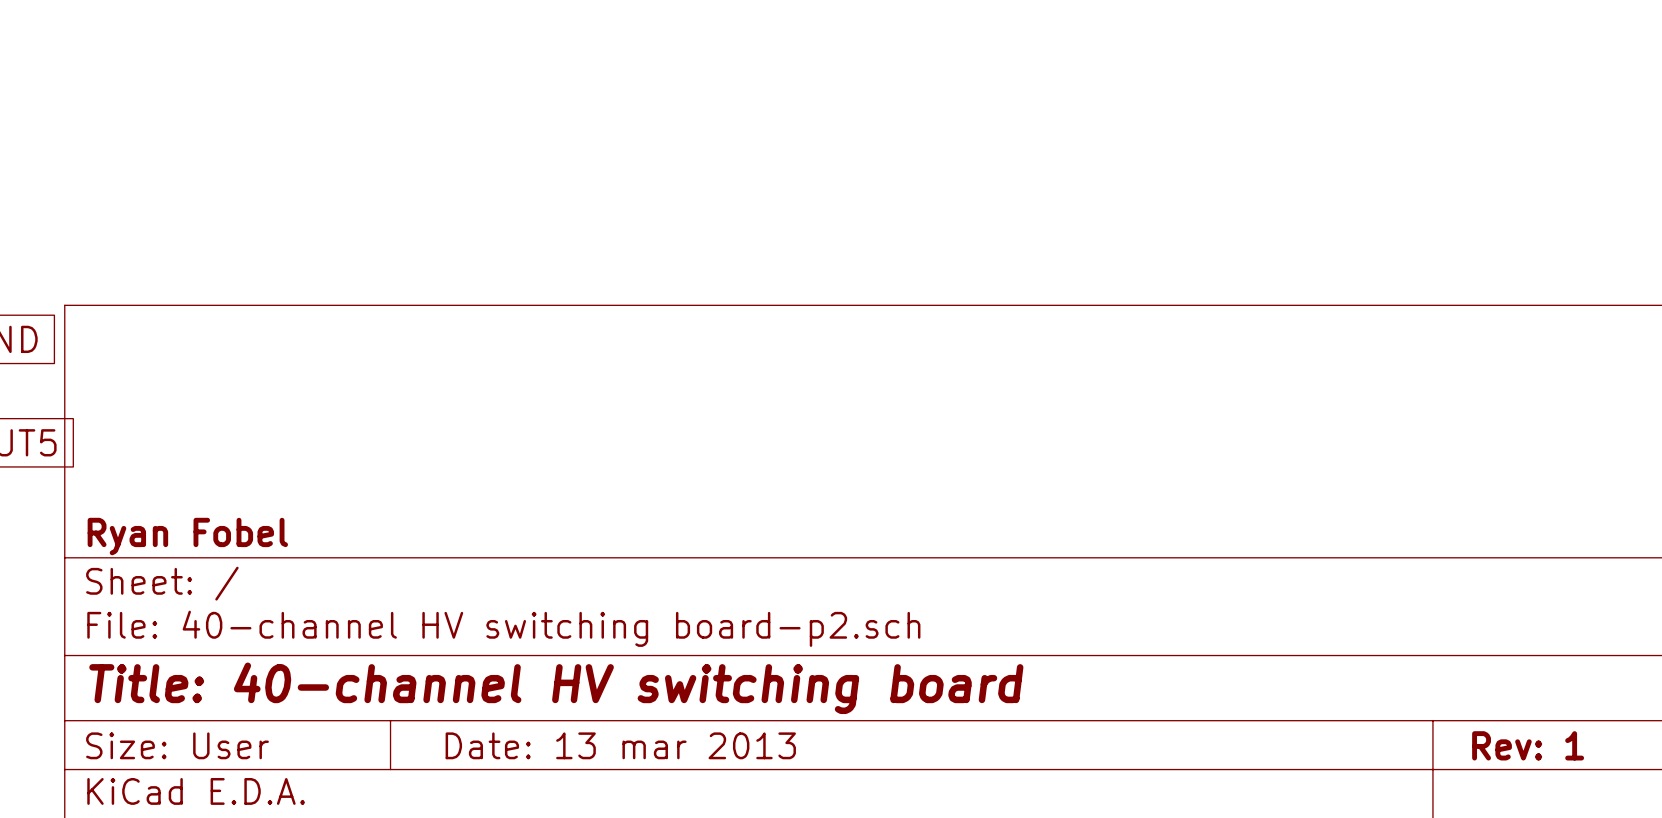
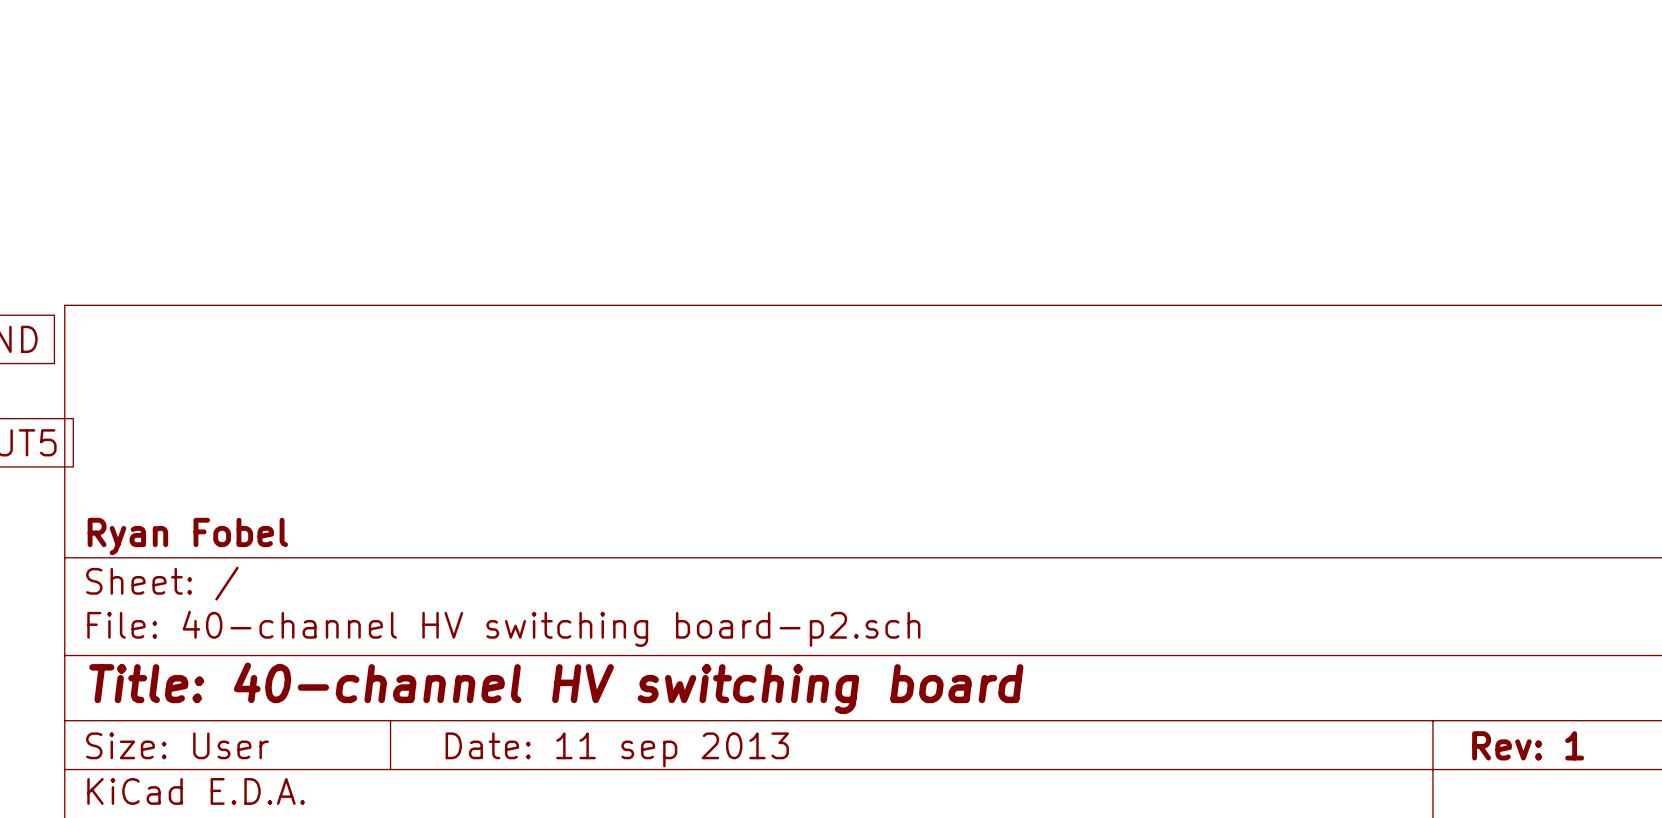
title block: Date: 13 mar 2013 (620, 745) -> Date: 11 sep 2013 (617, 749)

